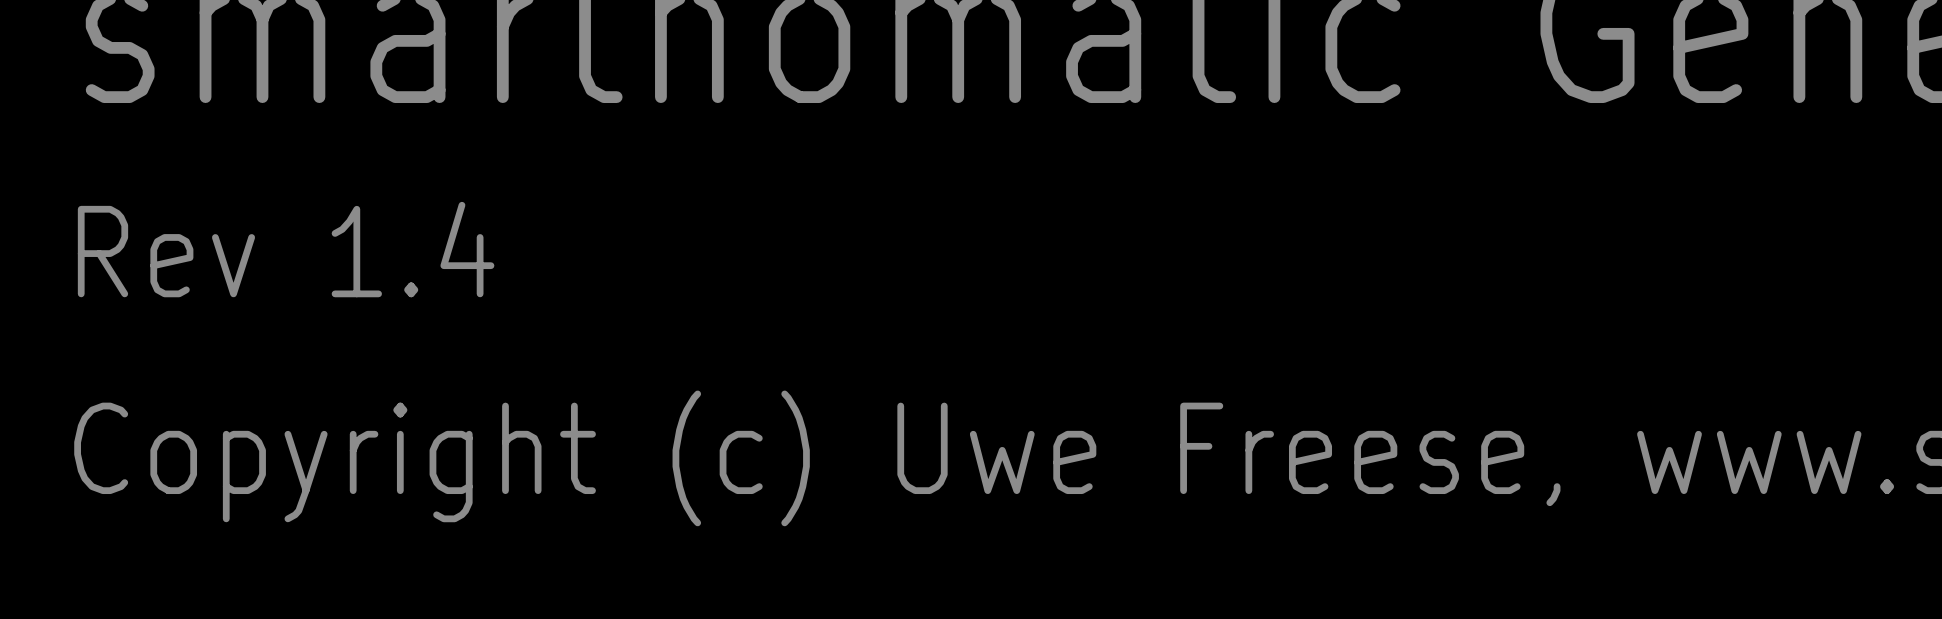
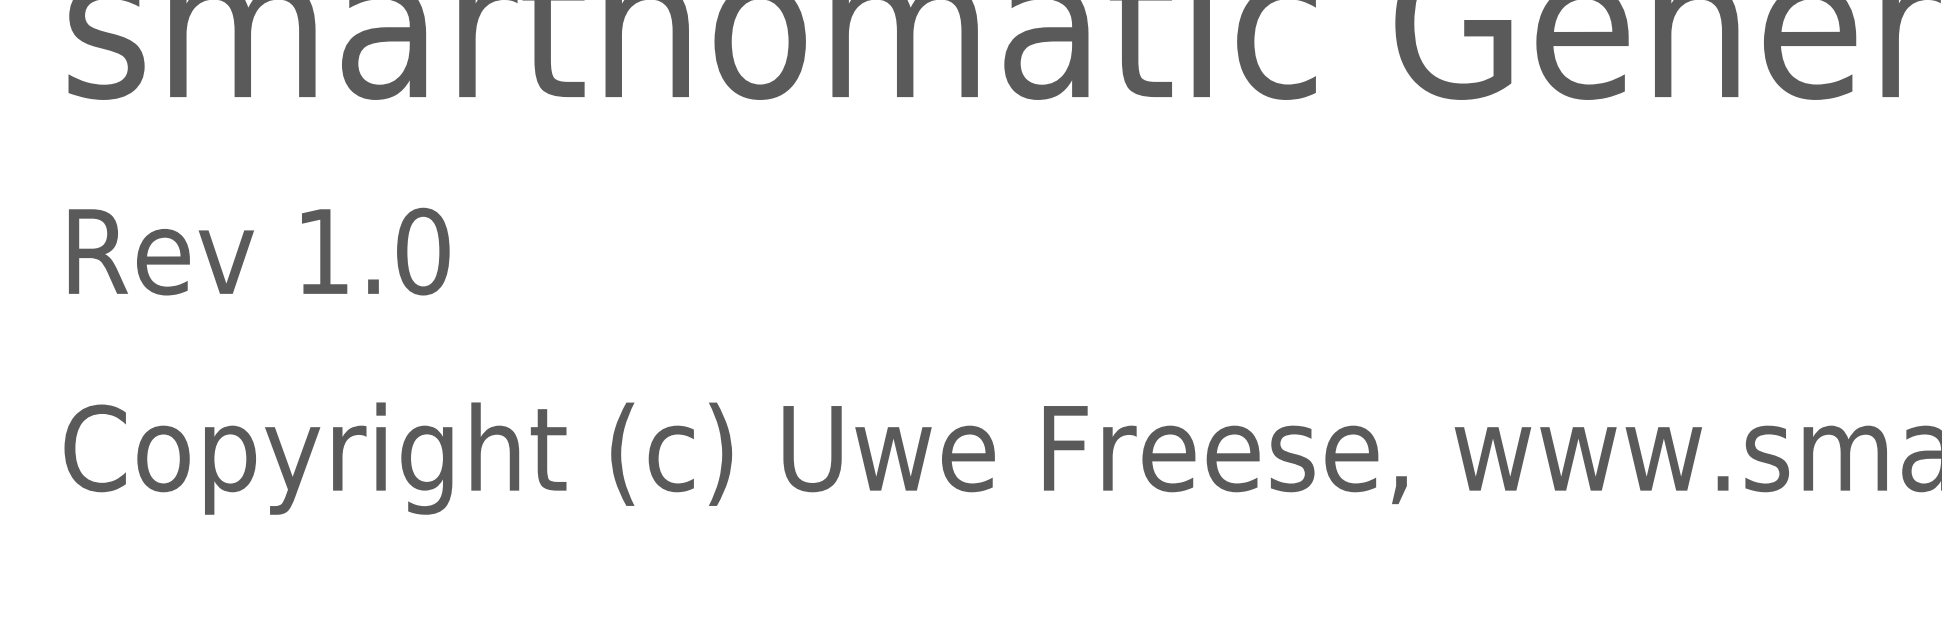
text: Rev 1.4 (286, 249) -> Rev 1.0 (259, 251)

